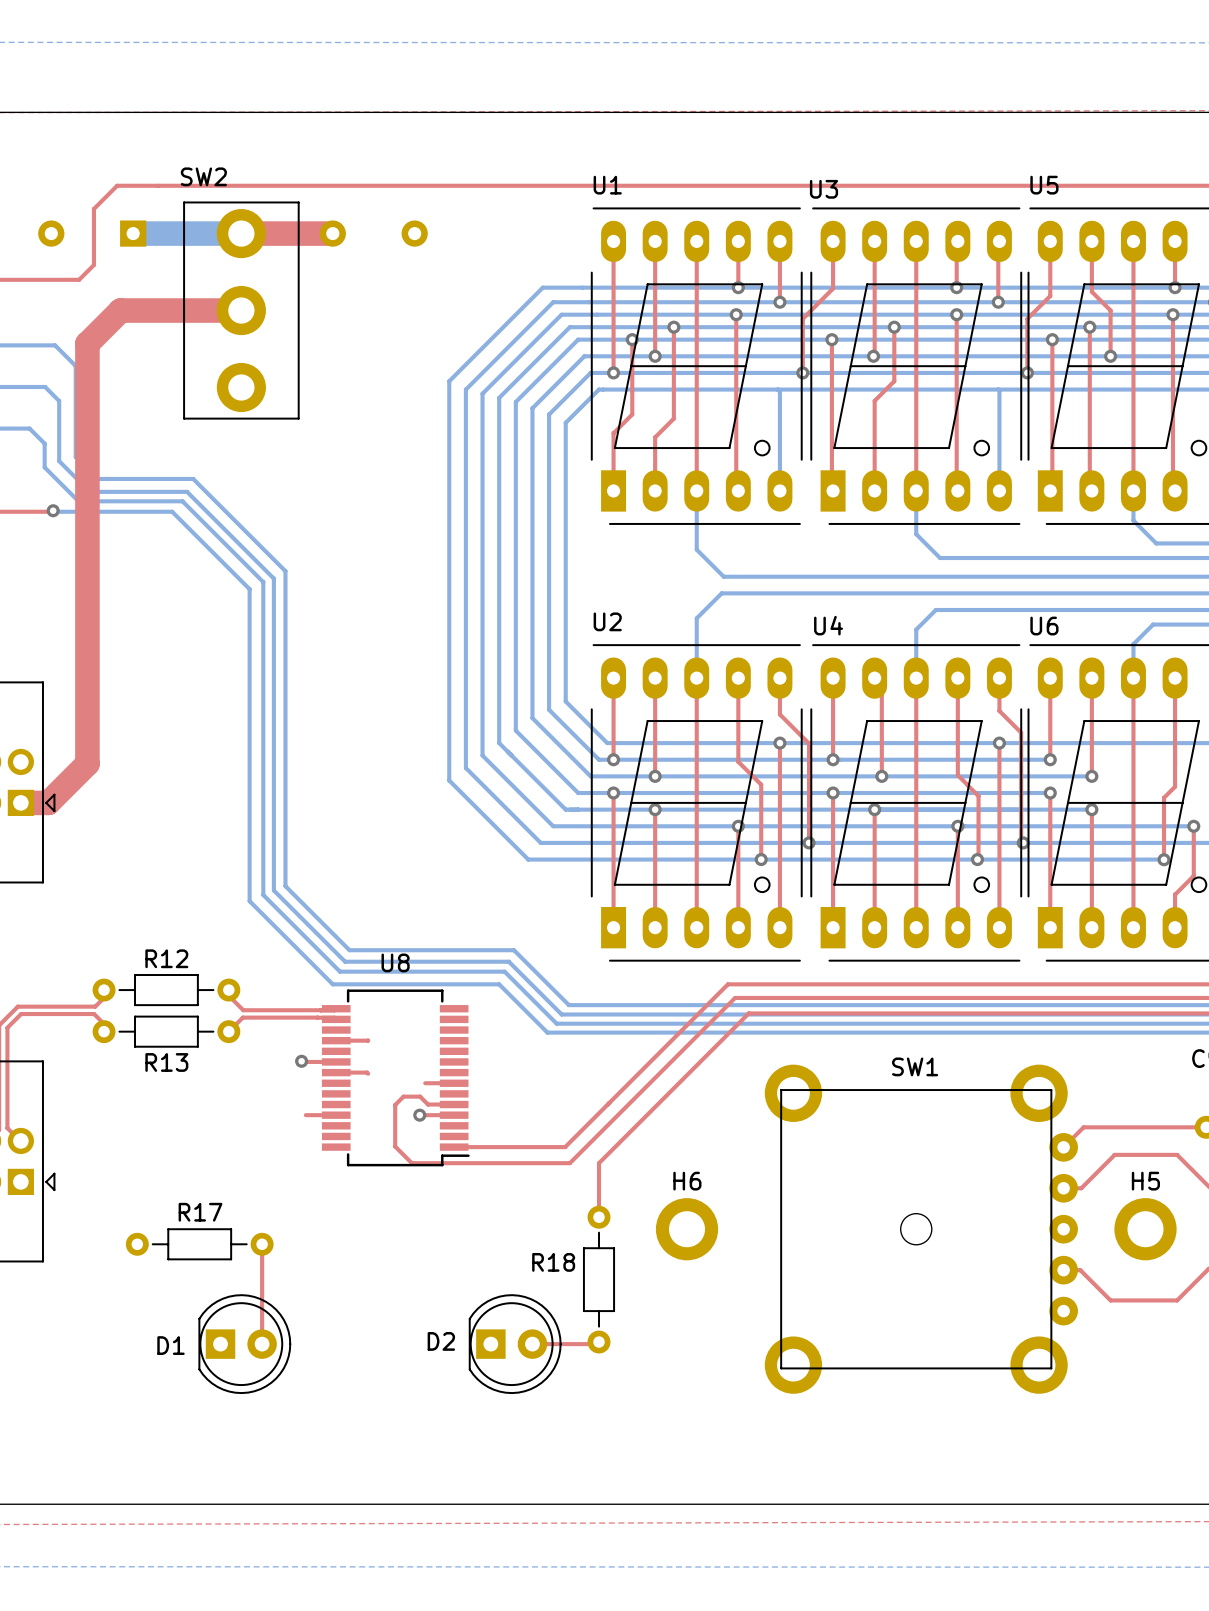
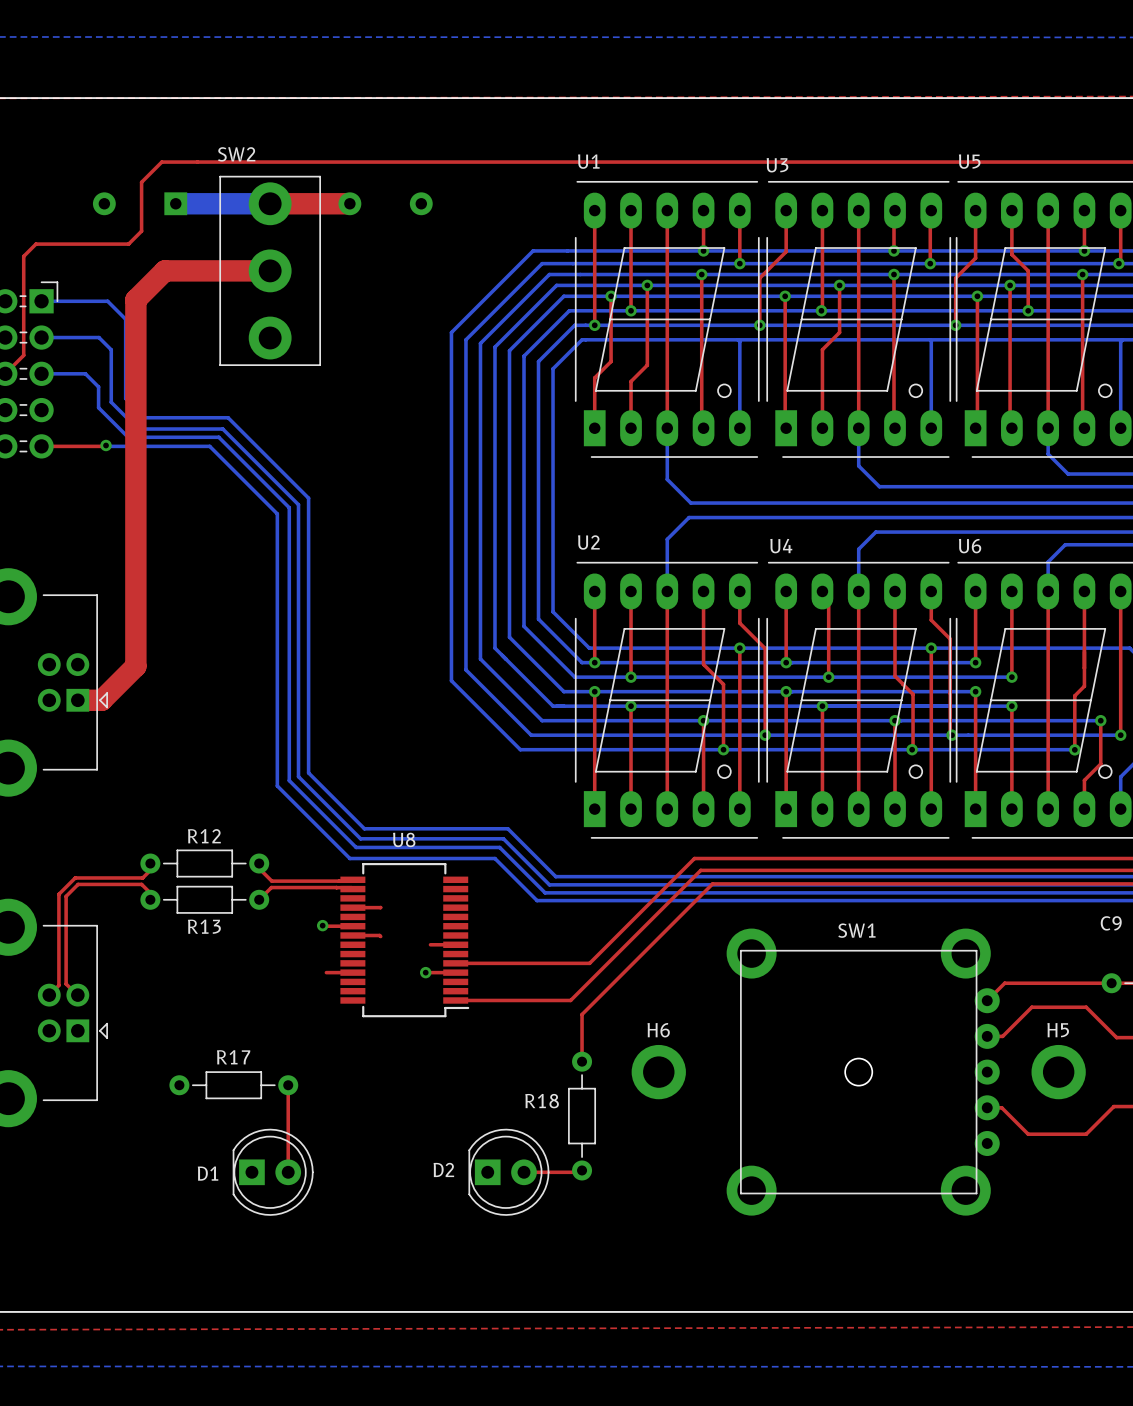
top track: (446, 1104) (428, 1104) (420, 1096) (403, 1096) (395, 1104) (395, 1146) (411, 1163) (569, 1163) (585, 1147) -> none
top track: none -> (455, 963) (589, 963)
top track: (607, 1104) (565, 1147) -> (570, 1000) (552, 1000)

